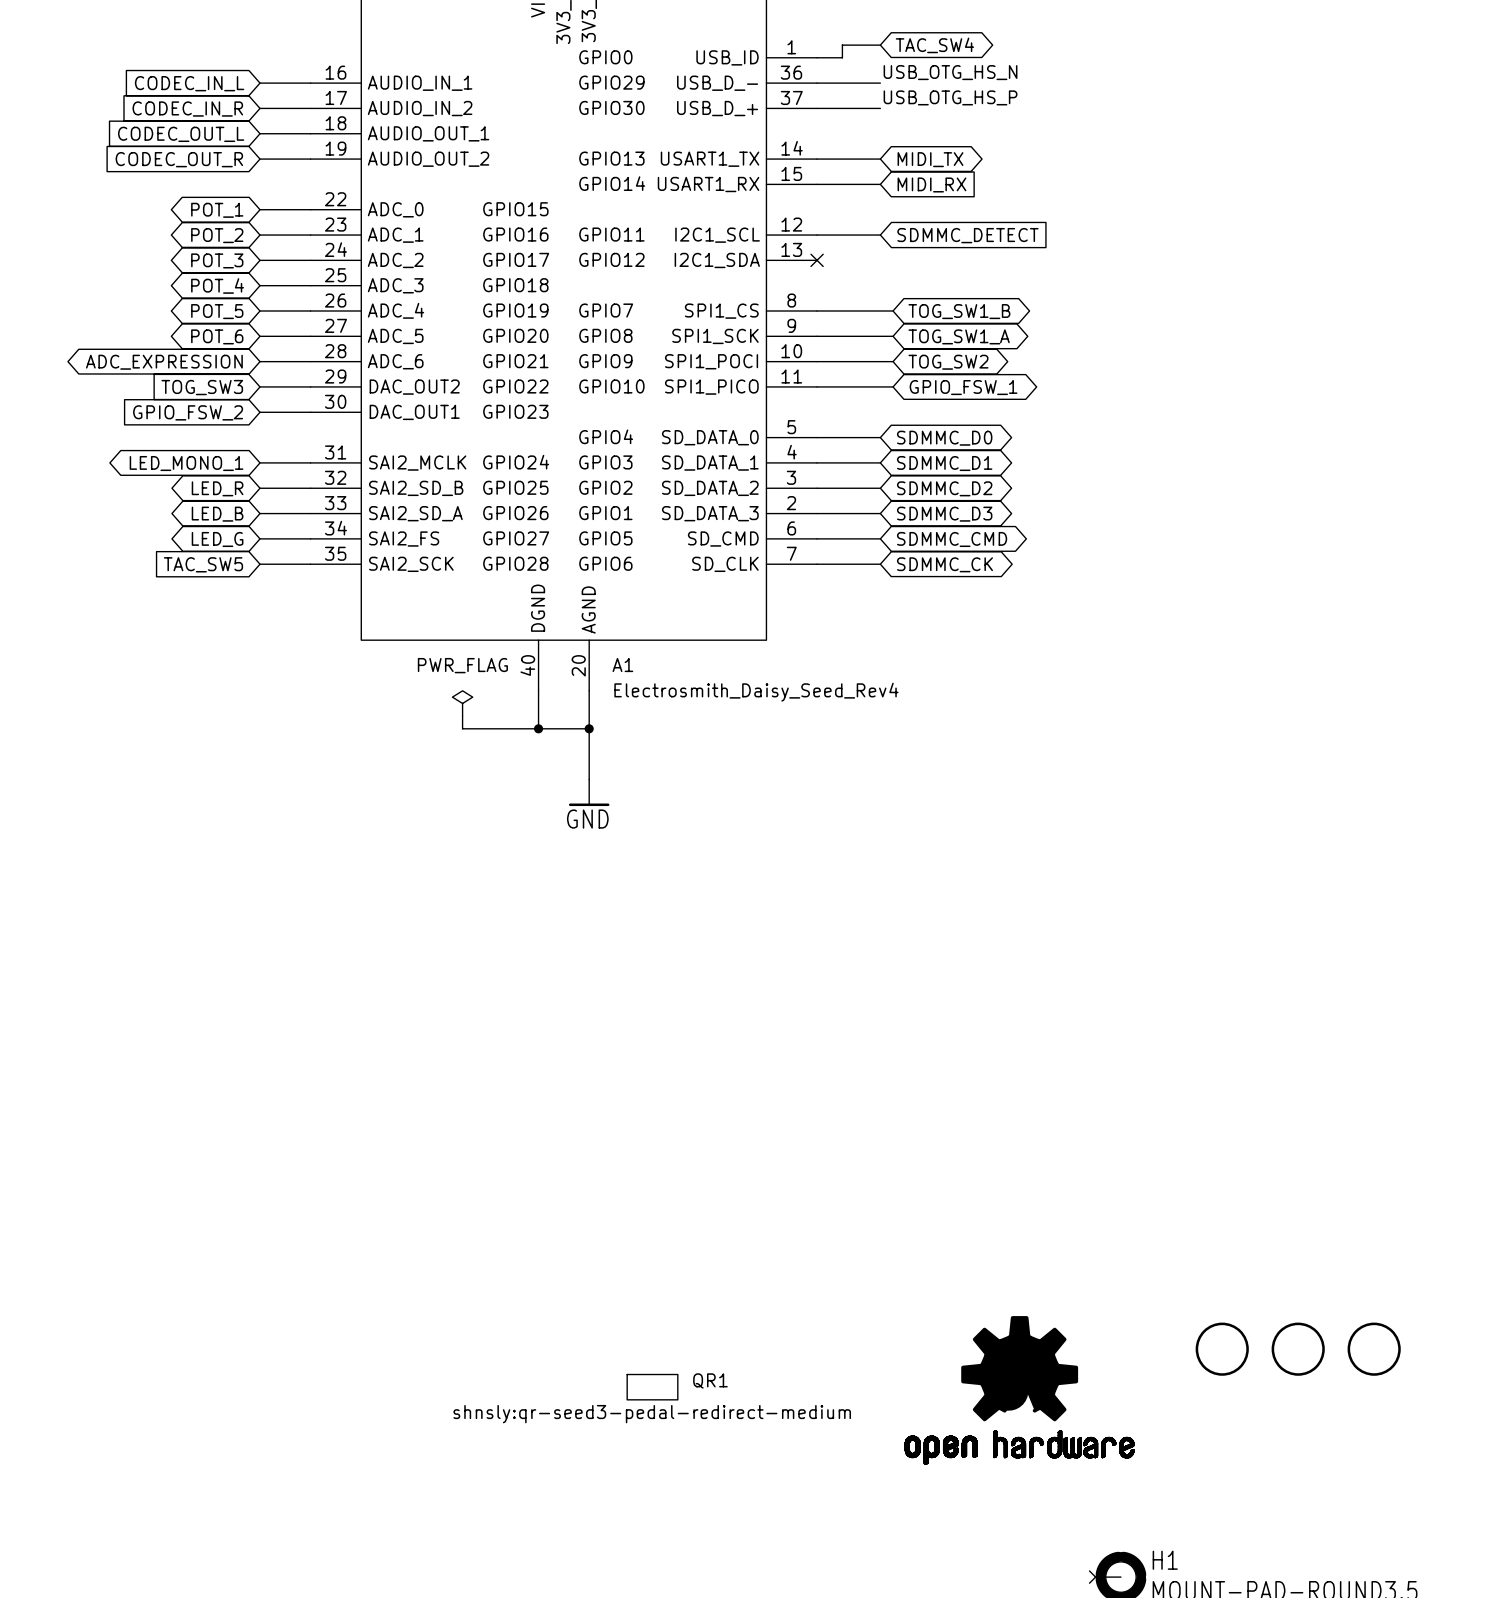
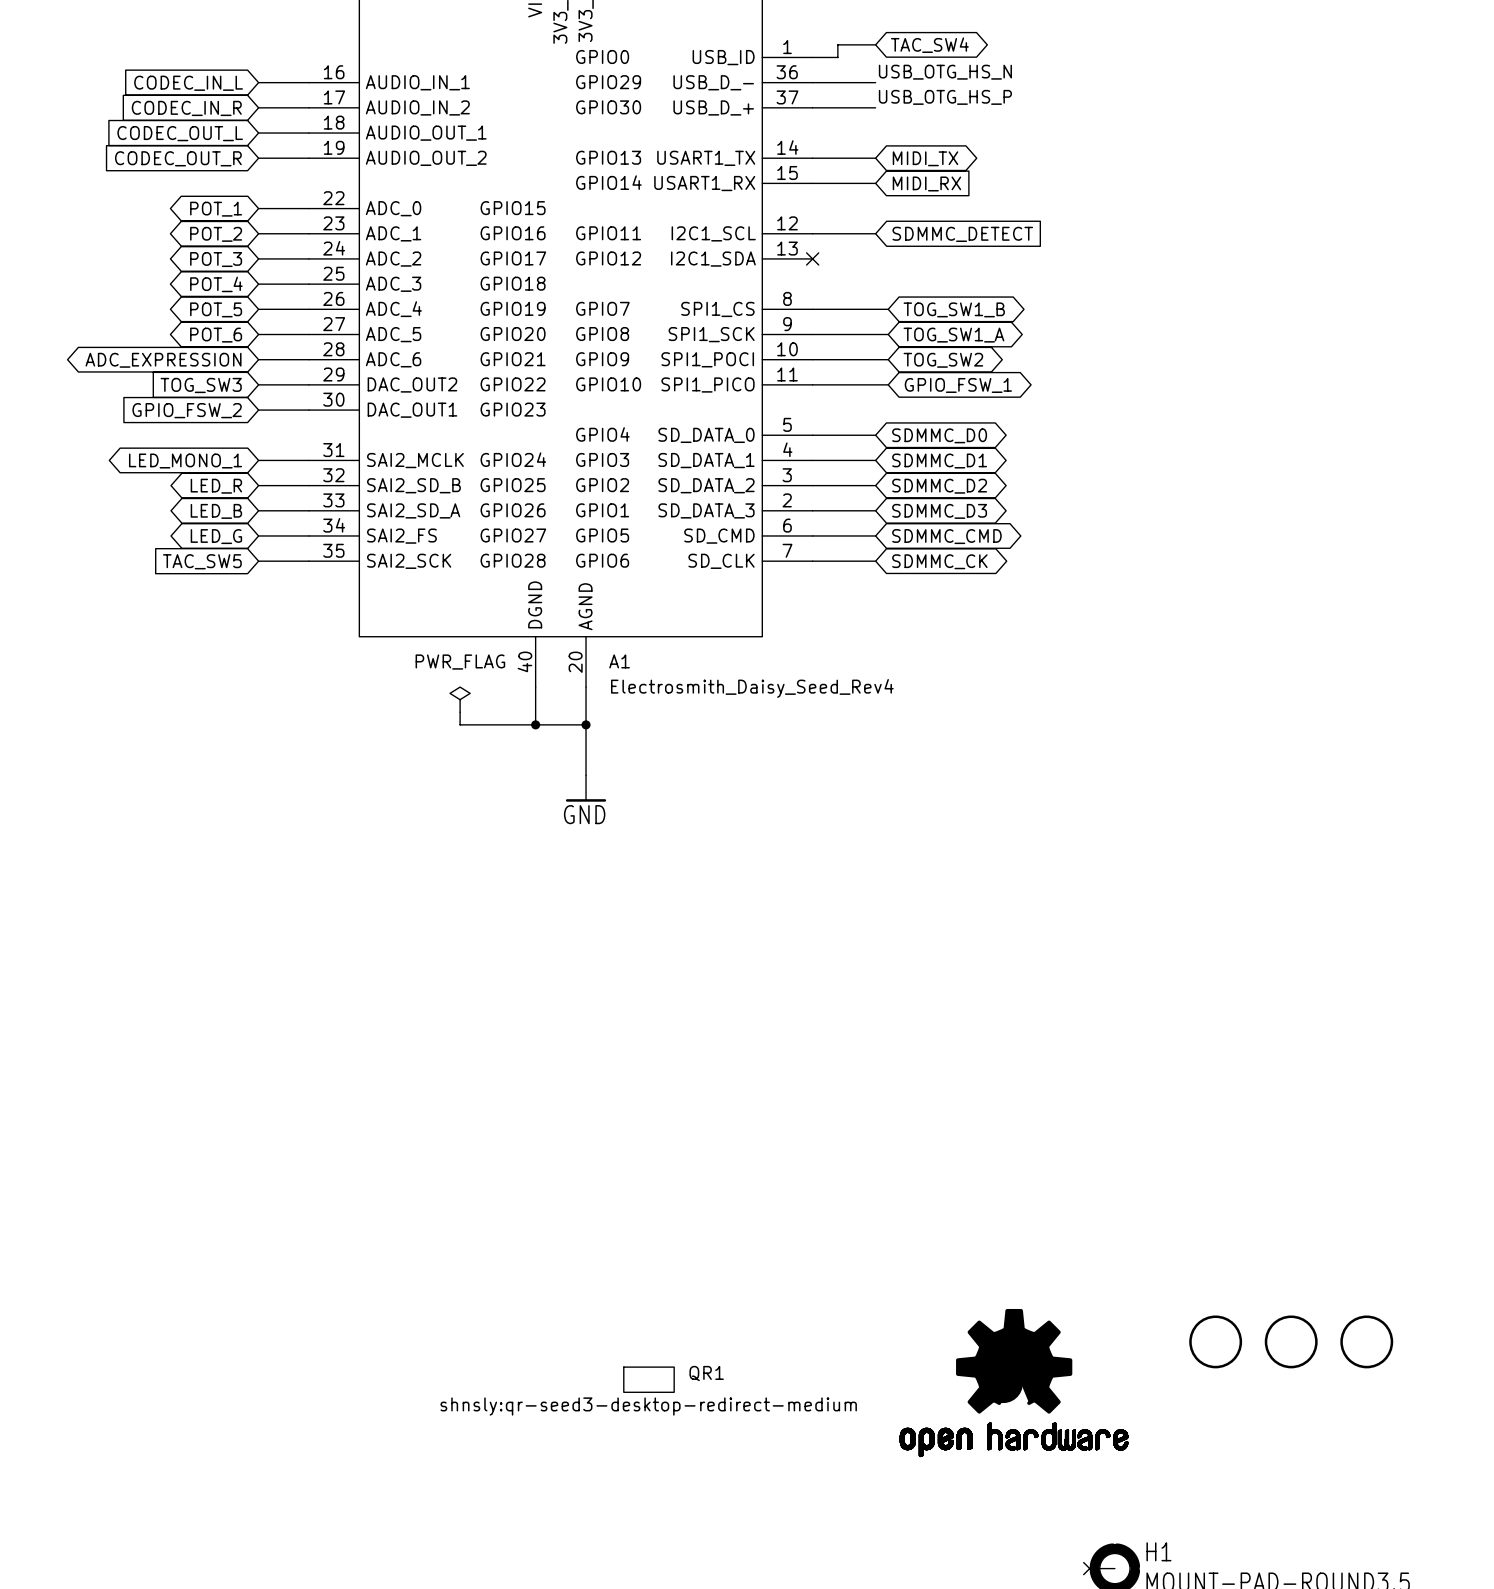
QR1 text: shnsly:qr-seed3-pedal-redirect-medium (652, 1414) -> shnsly:qr-seed3-desktop-redirect-medium (648, 1406)

